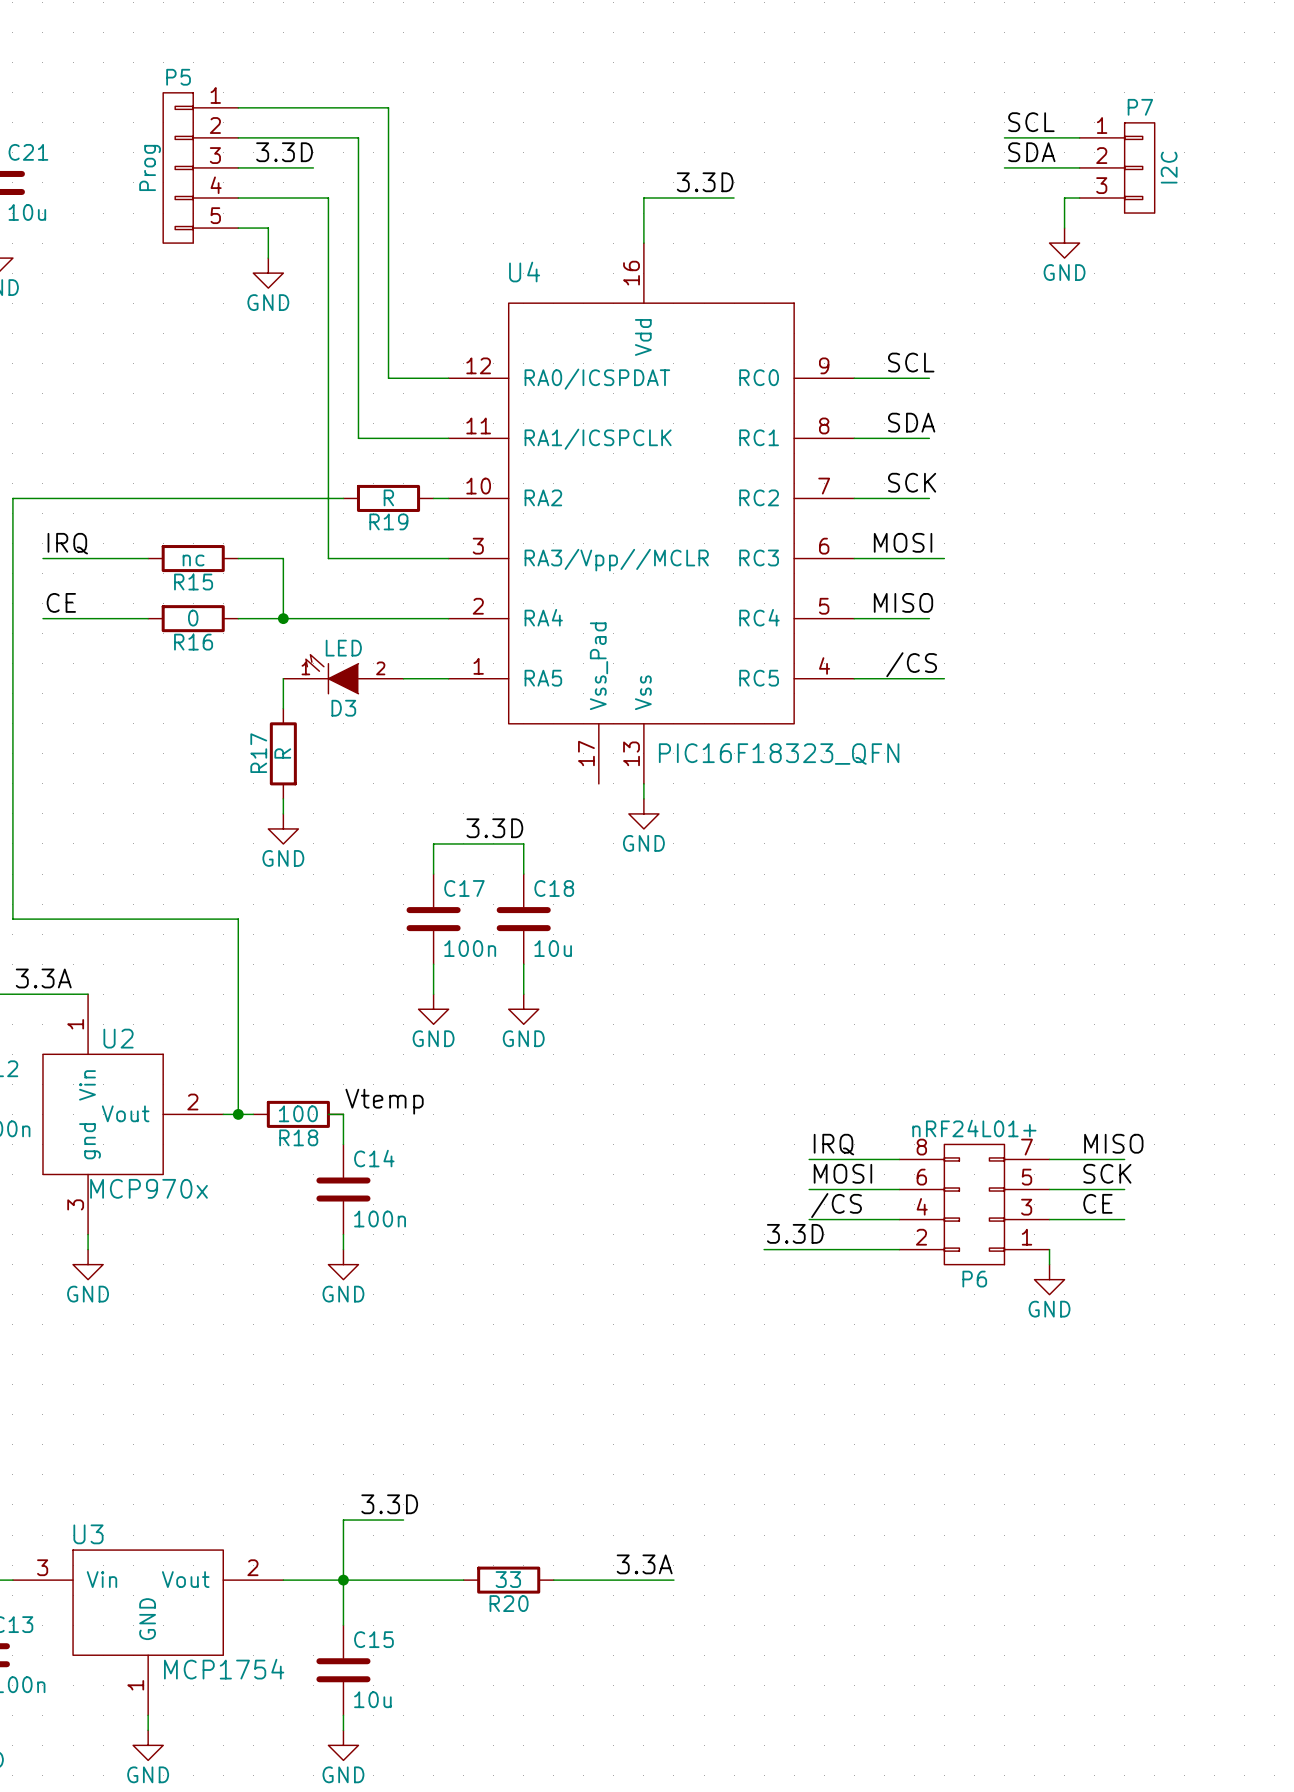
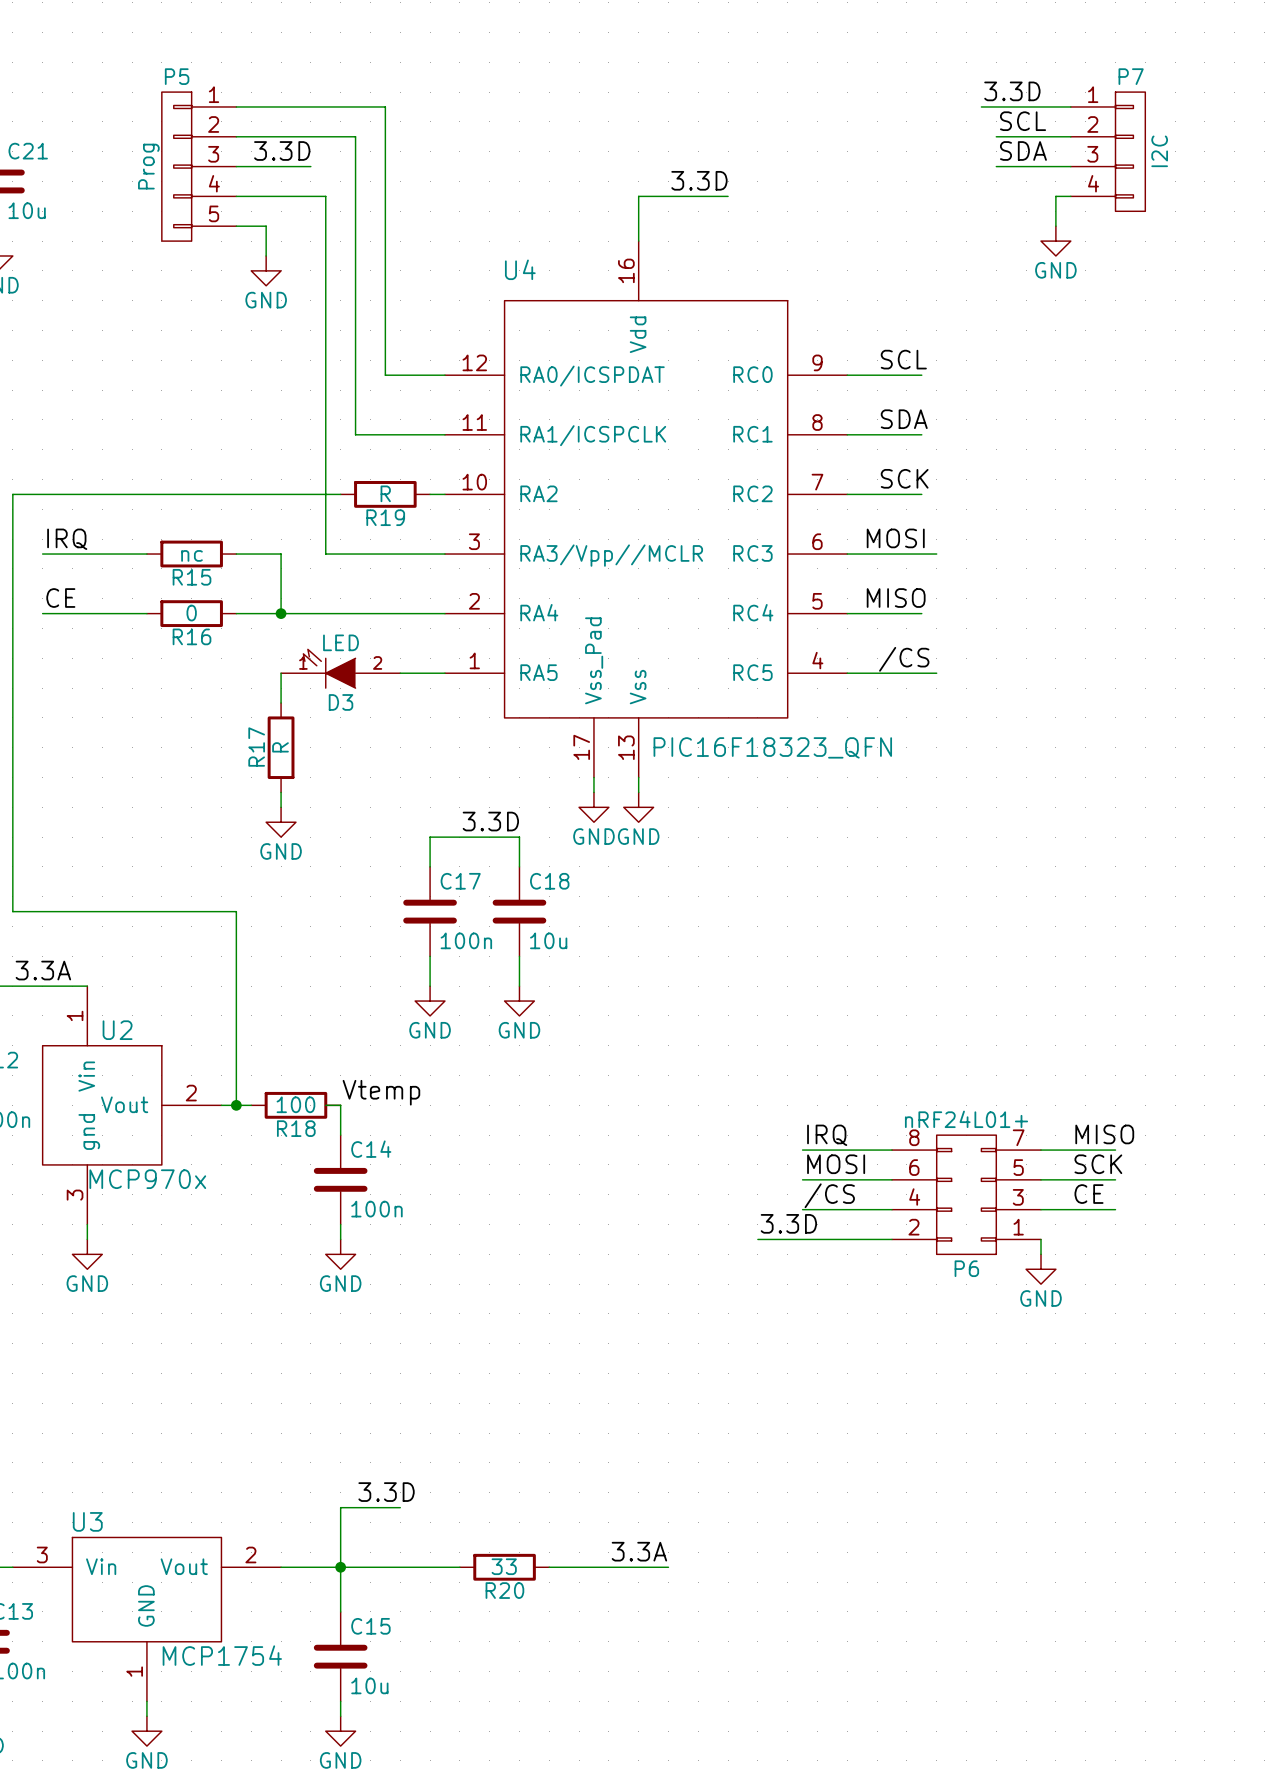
label: none -> 3.3D (1012, 91)
wire: none -> (981, 106) (1070, 106)
P7 symbol: [1079, 122, 1155, 214] -> [1070, 92, 1146, 212]
wire: none -> (593, 777) (593, 792)
power symbol: none -> GND (593, 807)

